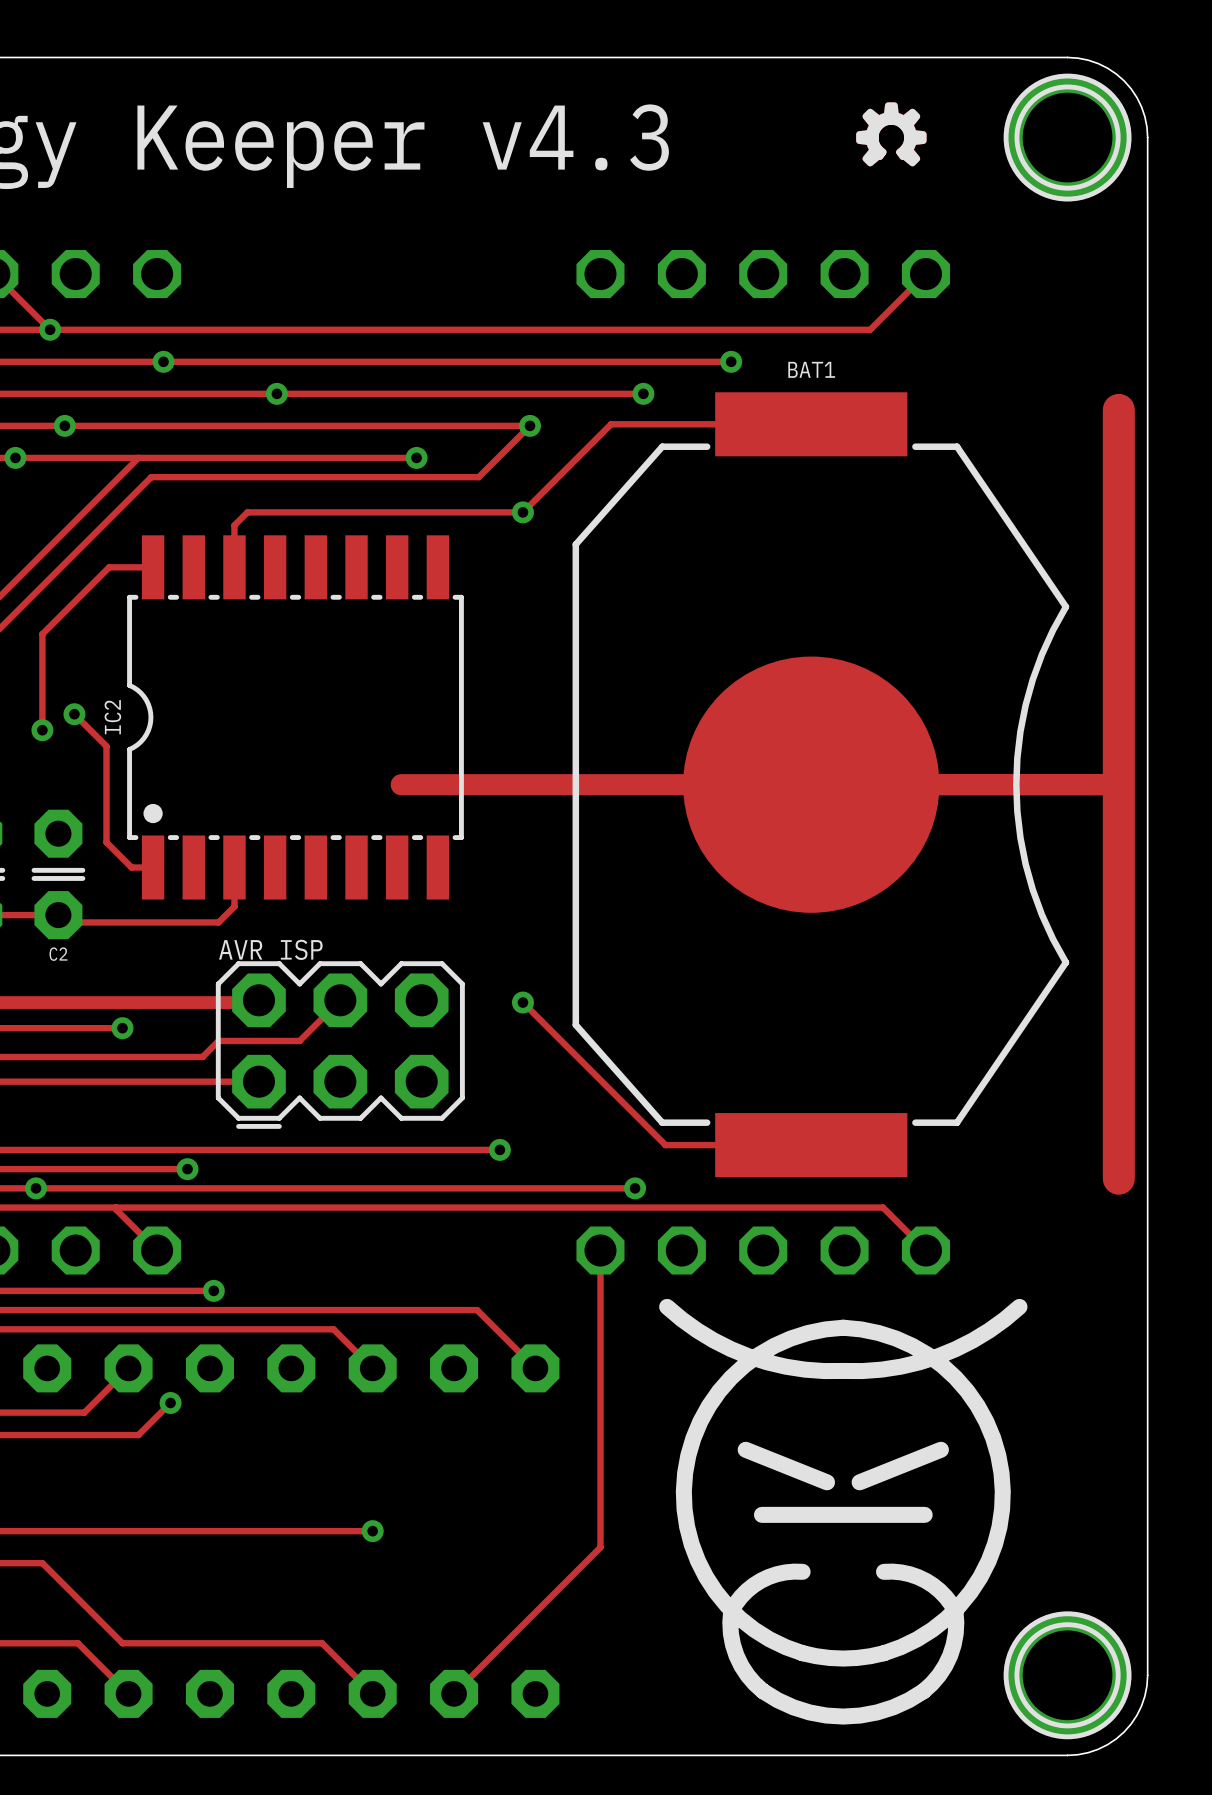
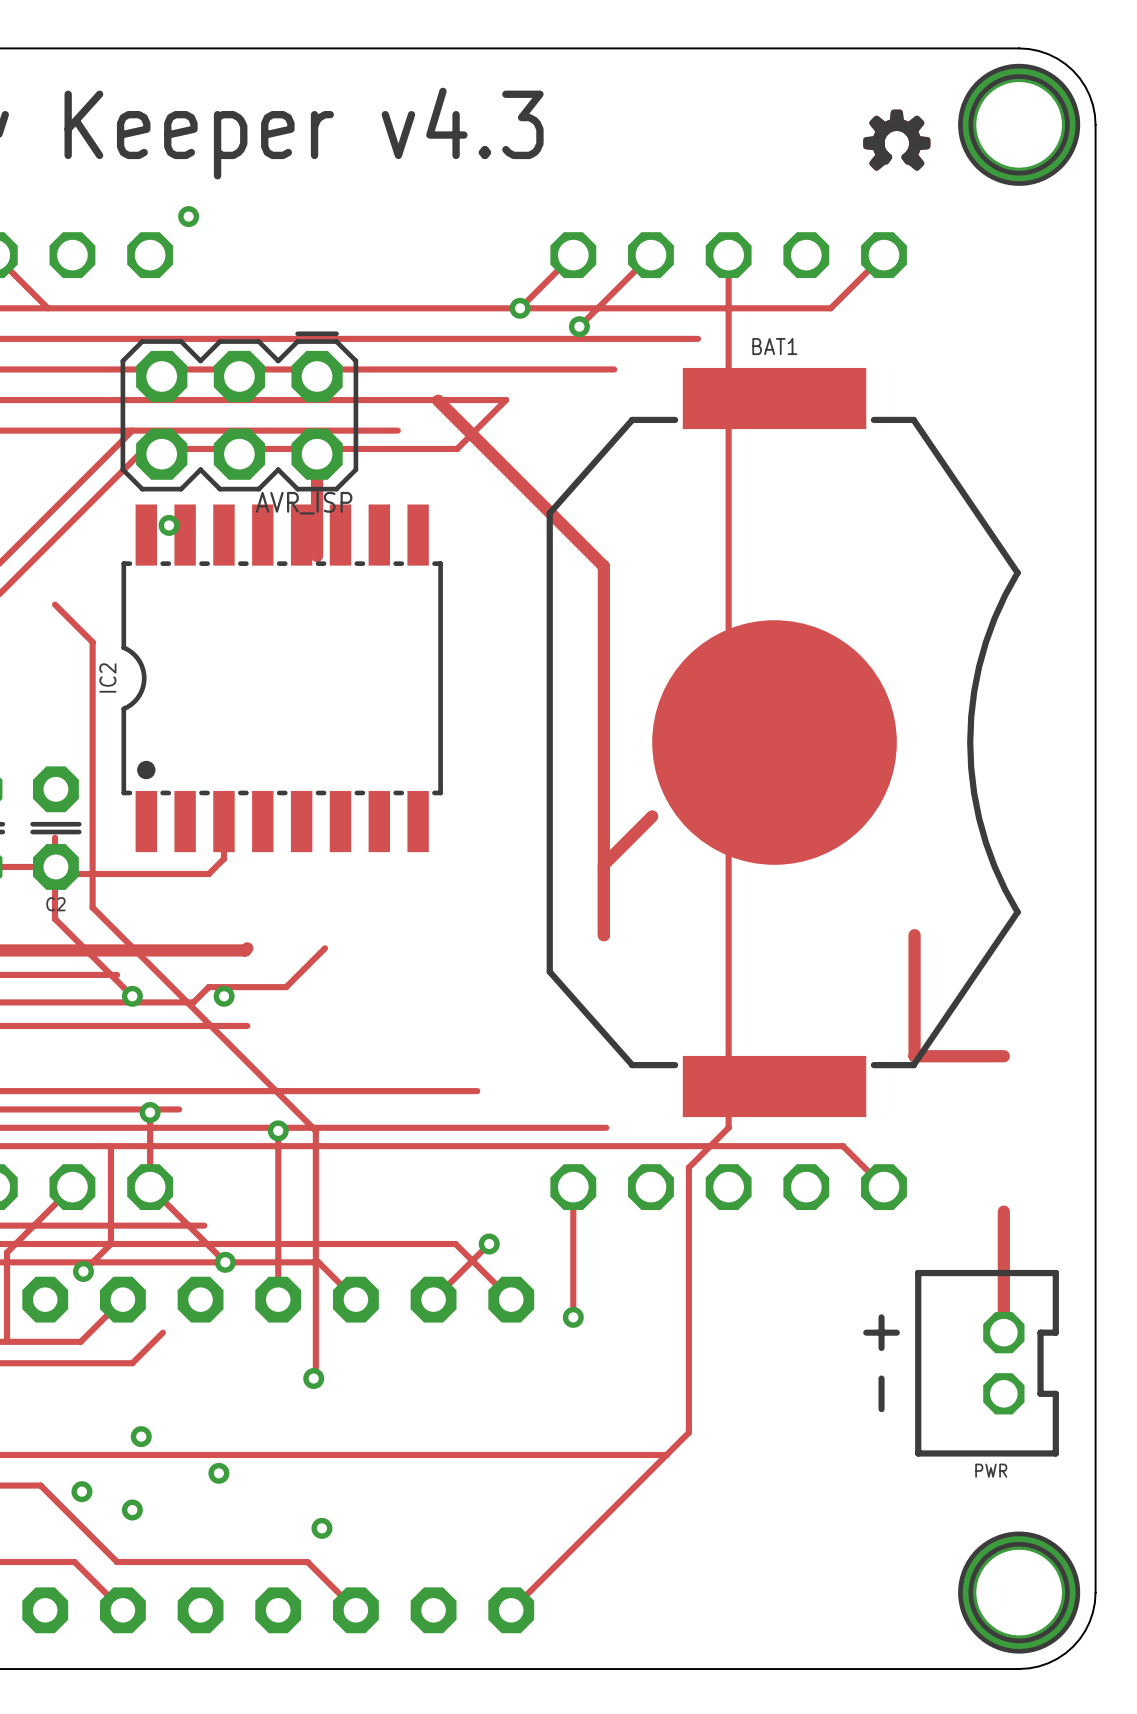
drawing position: (891, 134) -> (896, 140)
via: none -> (188, 216)
track: none -> (573, 255) (520, 308)
track: none -> (650, 255) (579, 326)
track: none -> (728, 255) (728, 1127) (688, 1167) (688, 1432) (511, 1610)
via: (50, 329) -> none
via: none -> (520, 308)
via: none -> (579, 326)
via: (163, 361) -> none
via: (731, 361) -> none
via: (276, 393) -> none
via: (643, 393) -> none
track: (1118, 409) (1118, 1178) -> none
track: (811, 424) (611, 424) (522, 512) (247, 512) (234, 525) (234, 567) -> none
via: (64, 425) -> none
via: (530, 425) -> none
track: none -> (438, 400) (603, 566) (603, 935)
via: (15, 457) -> none
via: (416, 457) -> none
track: none -> (317, 454) (317, 555)
via: (522, 512) -> none
via: none -> (169, 525)
track: (153, 567) (109, 567) (42, 634) (42, 730) -> none
track: none -> (55, 604) (92, 642) (92, 907) (315, 1130) (315, 1376) (313, 1378)
track: (74, 714) (106, 746) (106, 842) (131, 867) (153, 867) -> none
via: (74, 714) -> none
via: (42, 730) -> none
track: (401, 784) (1115, 784) -> none
track: none -> (652, 816) (603, 864)
track: none -> (55, 837) (55, 918) (132, 996)
track: none -> (914, 935) (914, 1056) (1003, 1056)
track: (522, 1002) (665, 1145) (811, 1145) -> none
via: (522, 1002) -> none
via position: (122, 1028) -> (132, 996)
AVR_ISP rotation: 0° (340, 1045) -> 180° (239, 411)
AVR_ISP position: (340, 1045) -> (239, 411)
via: none -> (224, 996)
via: (499, 1149) -> none
via position: (187, 1169) -> (150, 1112)
track: none -> (150, 1112) (150, 1187) (225, 1262)
via: (36, 1188) -> none
via: (635, 1188) -> none
track: none -> (278, 1130) (278, 1299)
via: none -> (278, 1130)
track: (116, 1209) (157, 1250) -> (110, 1147) (110, 1243) (83, 1271)
track: none -> (72, 1187) (7, 1252) (7, 1338)
track: none -> (1003, 1211) (1003, 1332)
via position: (213, 1290) -> (225, 1262)
drawing: [659, 1298, 1028, 1725] -> none
track: none -> (489, 1243) (433, 1299)
via: none -> (489, 1243)
via: none -> (83, 1271)
track: (600, 1386) (600, 1547) (454, 1693) -> none
via: none -> (573, 1317)
line: none -> (881, 1317) (881, 1347)
via: (170, 1403) -> none
line: none -> (866, 1332) (896, 1332)
PWR: none -> (987, 1363)
via: none -> (313, 1378)
line: none -> (881, 1378) (881, 1409)
via: none -> (141, 1436)
track: none -> (355, 1454) (666, 1454)
via: (372, 1531) -> none
via: none -> (218, 1473)
via: none -> (81, 1491)
via: none -> (132, 1510)
via: none -> (321, 1528)

